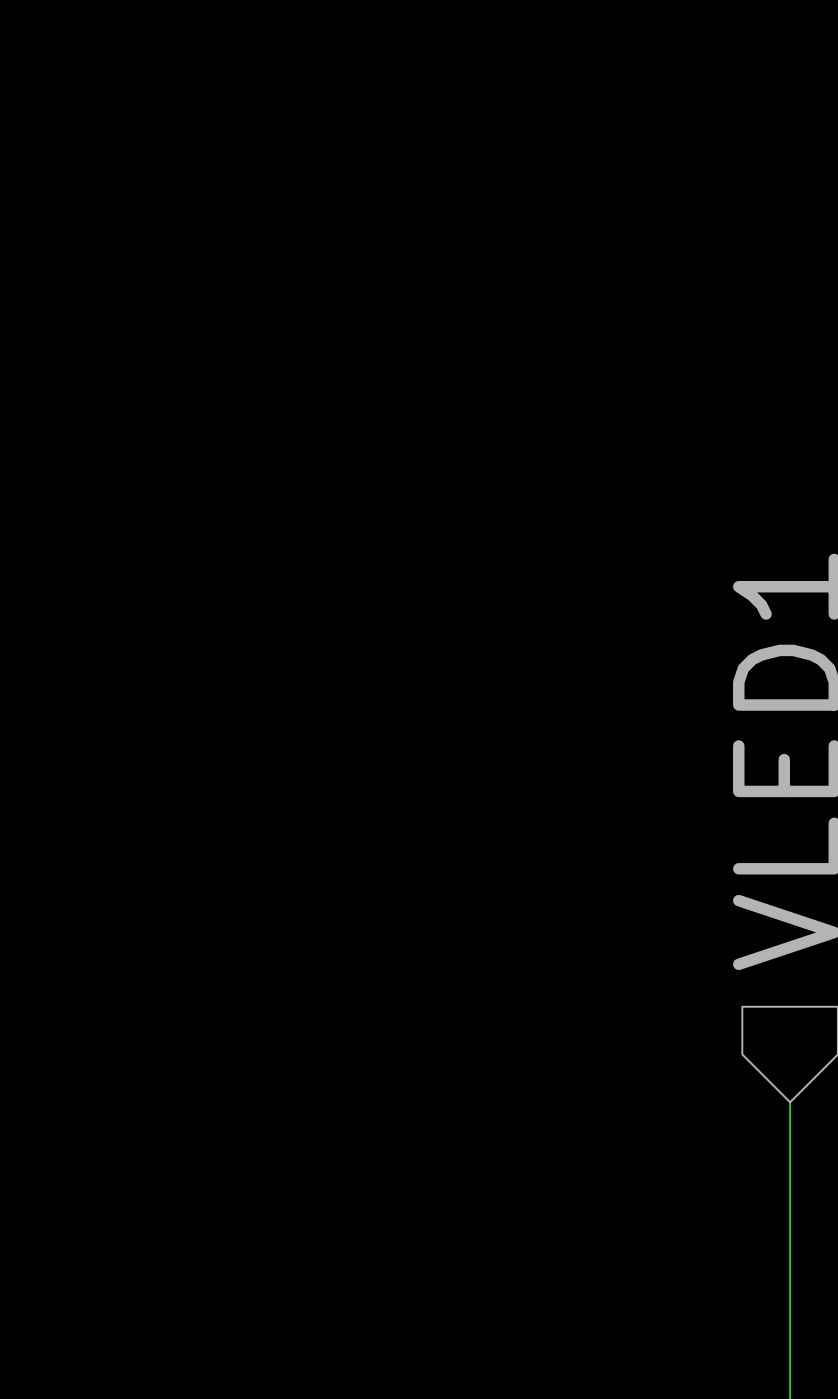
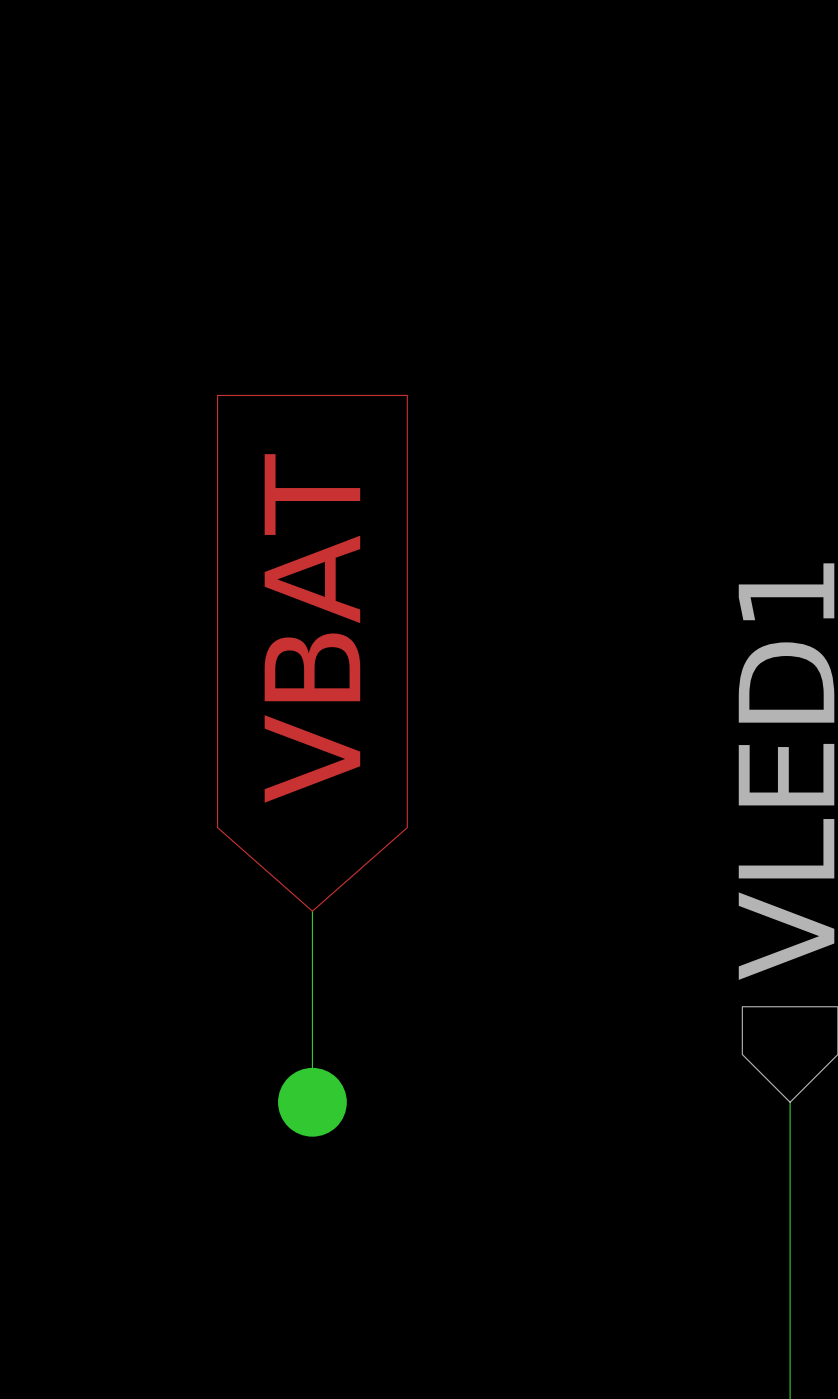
global label: none -> VBAT (312, 628)
wire: none -> (312, 911) (312, 1102)
junction: none -> (312, 1102)

